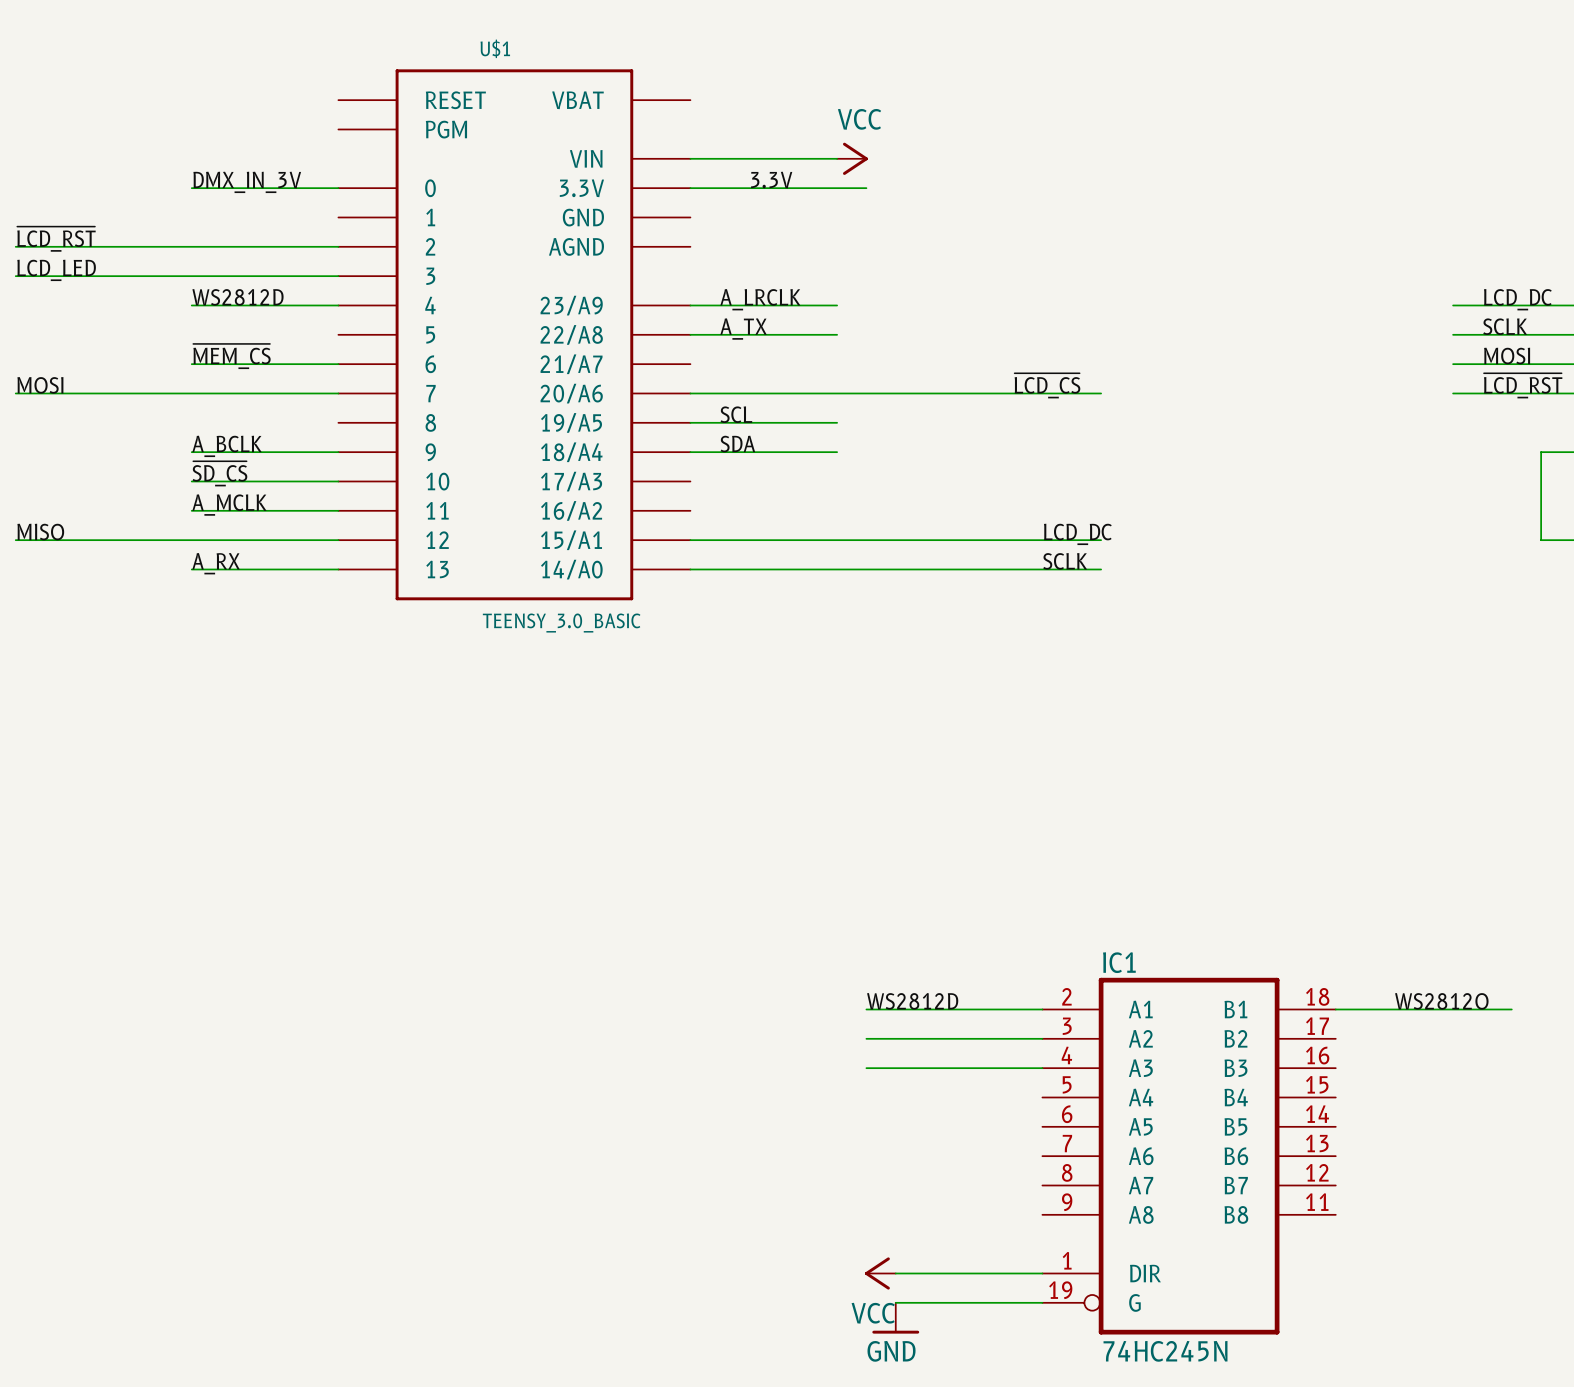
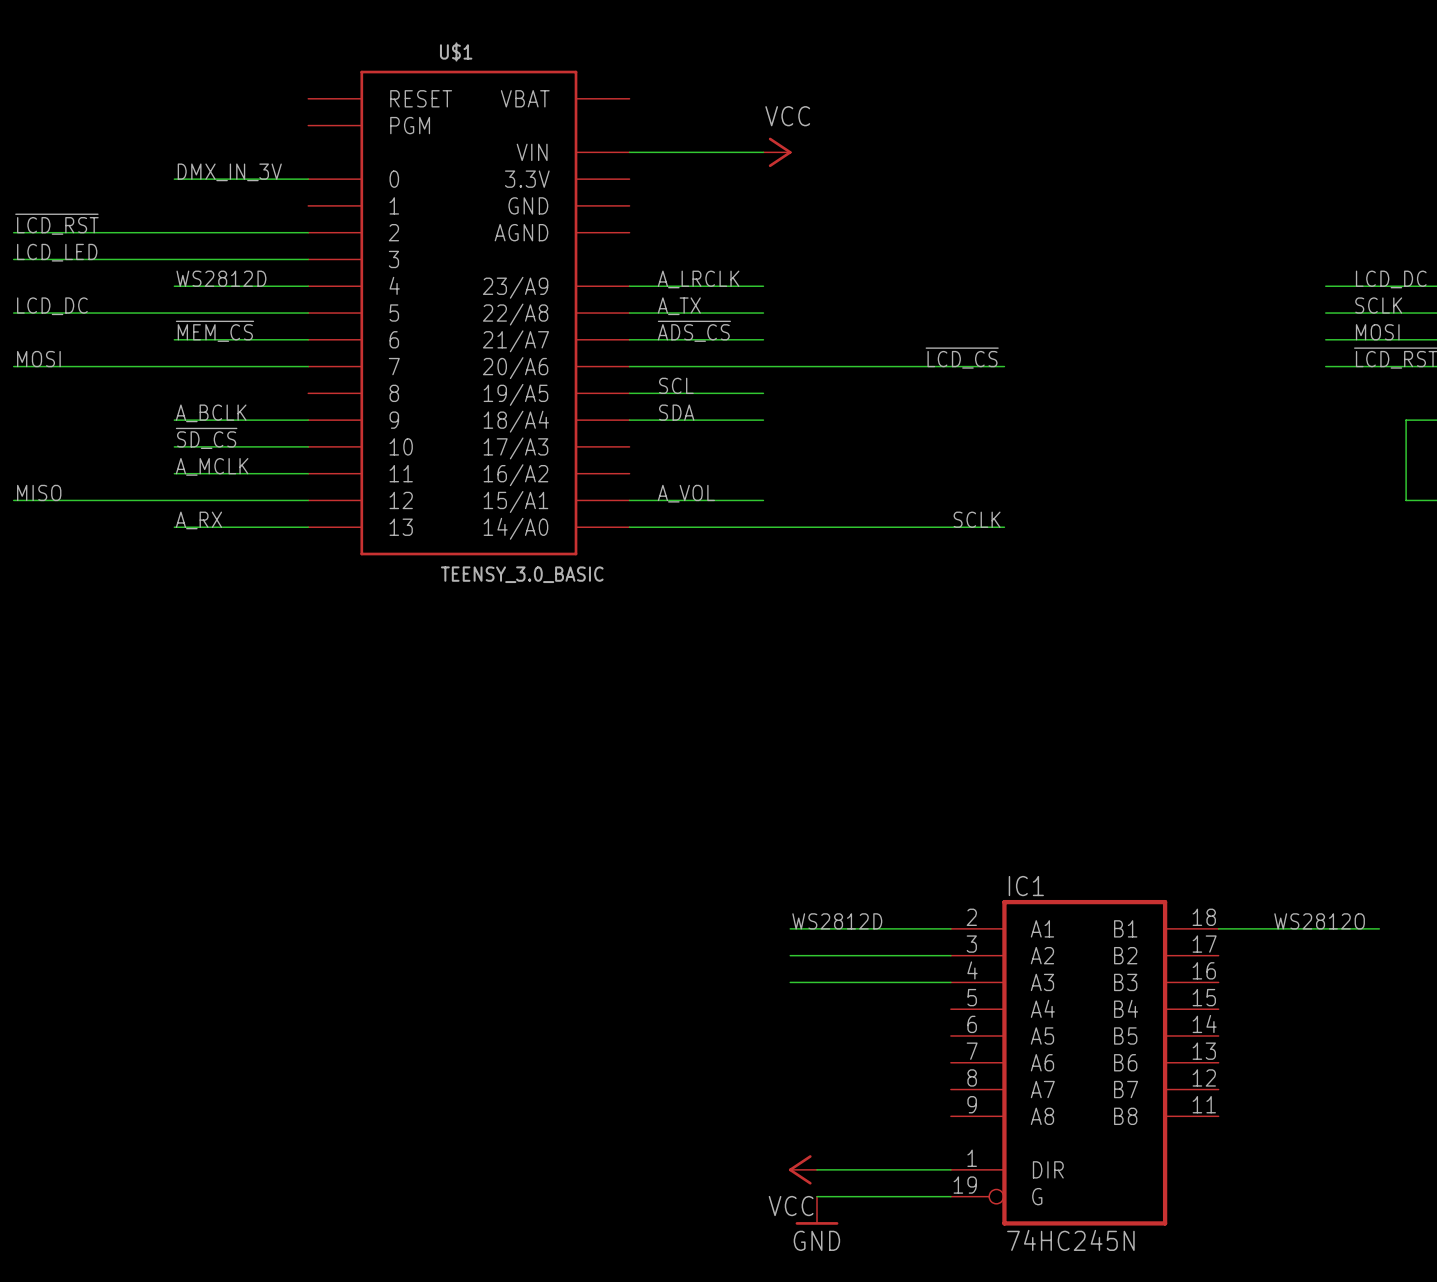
label: 3.3V (771, 180) -> none
wire: (690, 188) (866, 188) -> none
label: none -> LCD_DC (52, 306)
wire: none -> (13, 313) (308, 313)
label: none -> ~{ADS_CS} (694, 331)
wire: none -> (629, 339) (763, 339)
label: none -> A_VOL (686, 493)
label: LCD_DC (1077, 534) -> none
wire: (837, 540) (1101, 540) -> none

